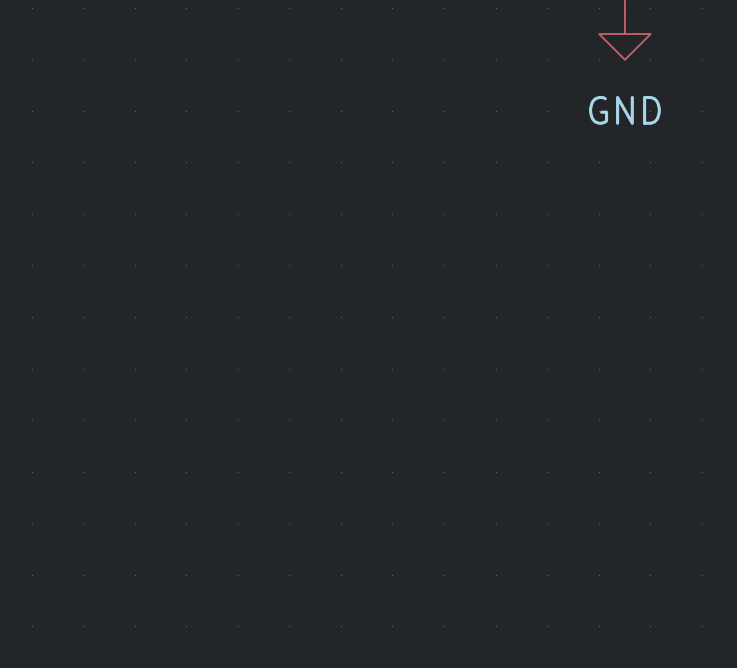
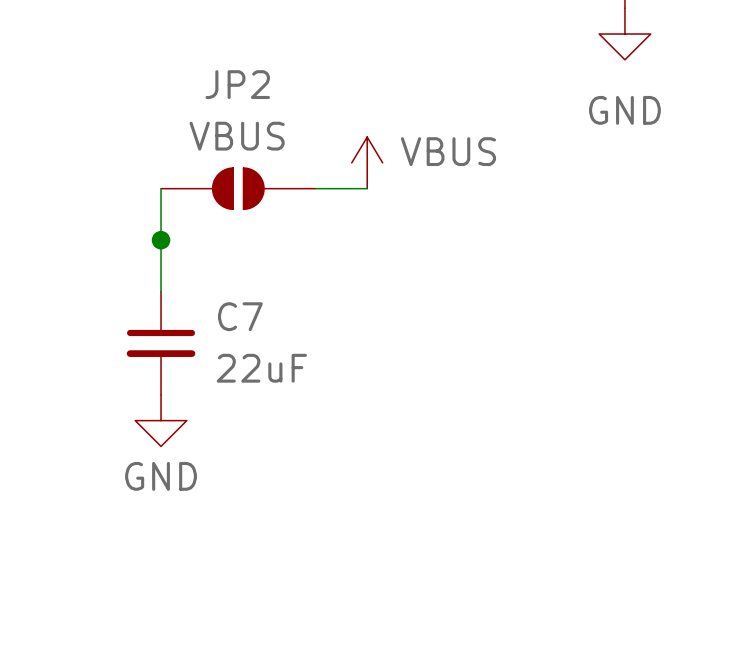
power symbol: none -> VBUS (367, 162)
wire: none -> (161, 188) (161, 291)
JP2: none -> VBUS (238, 188)
wire: none -> (315, 188) (367, 188)
junction: none -> (161, 240)
C7: none -> 22uF (161, 343)
power symbol: none -> GND (161, 420)

